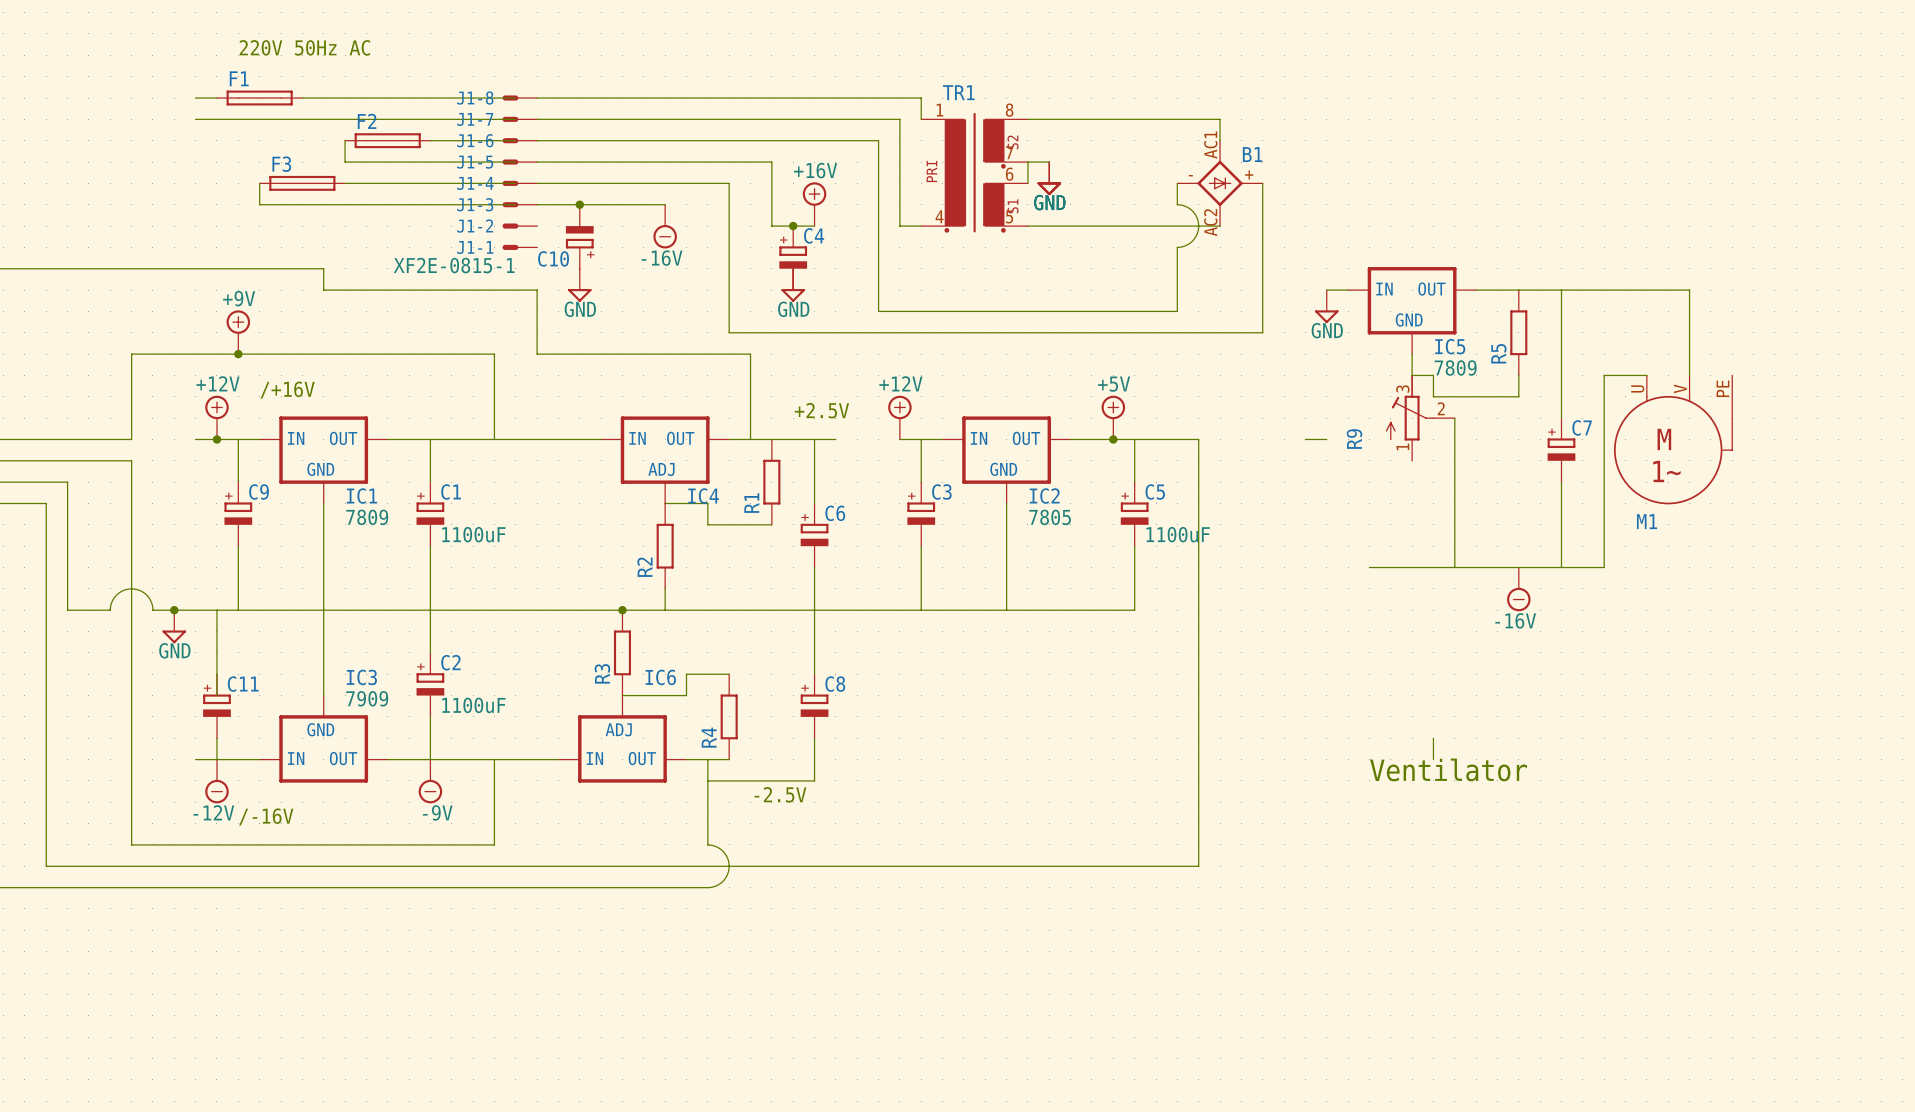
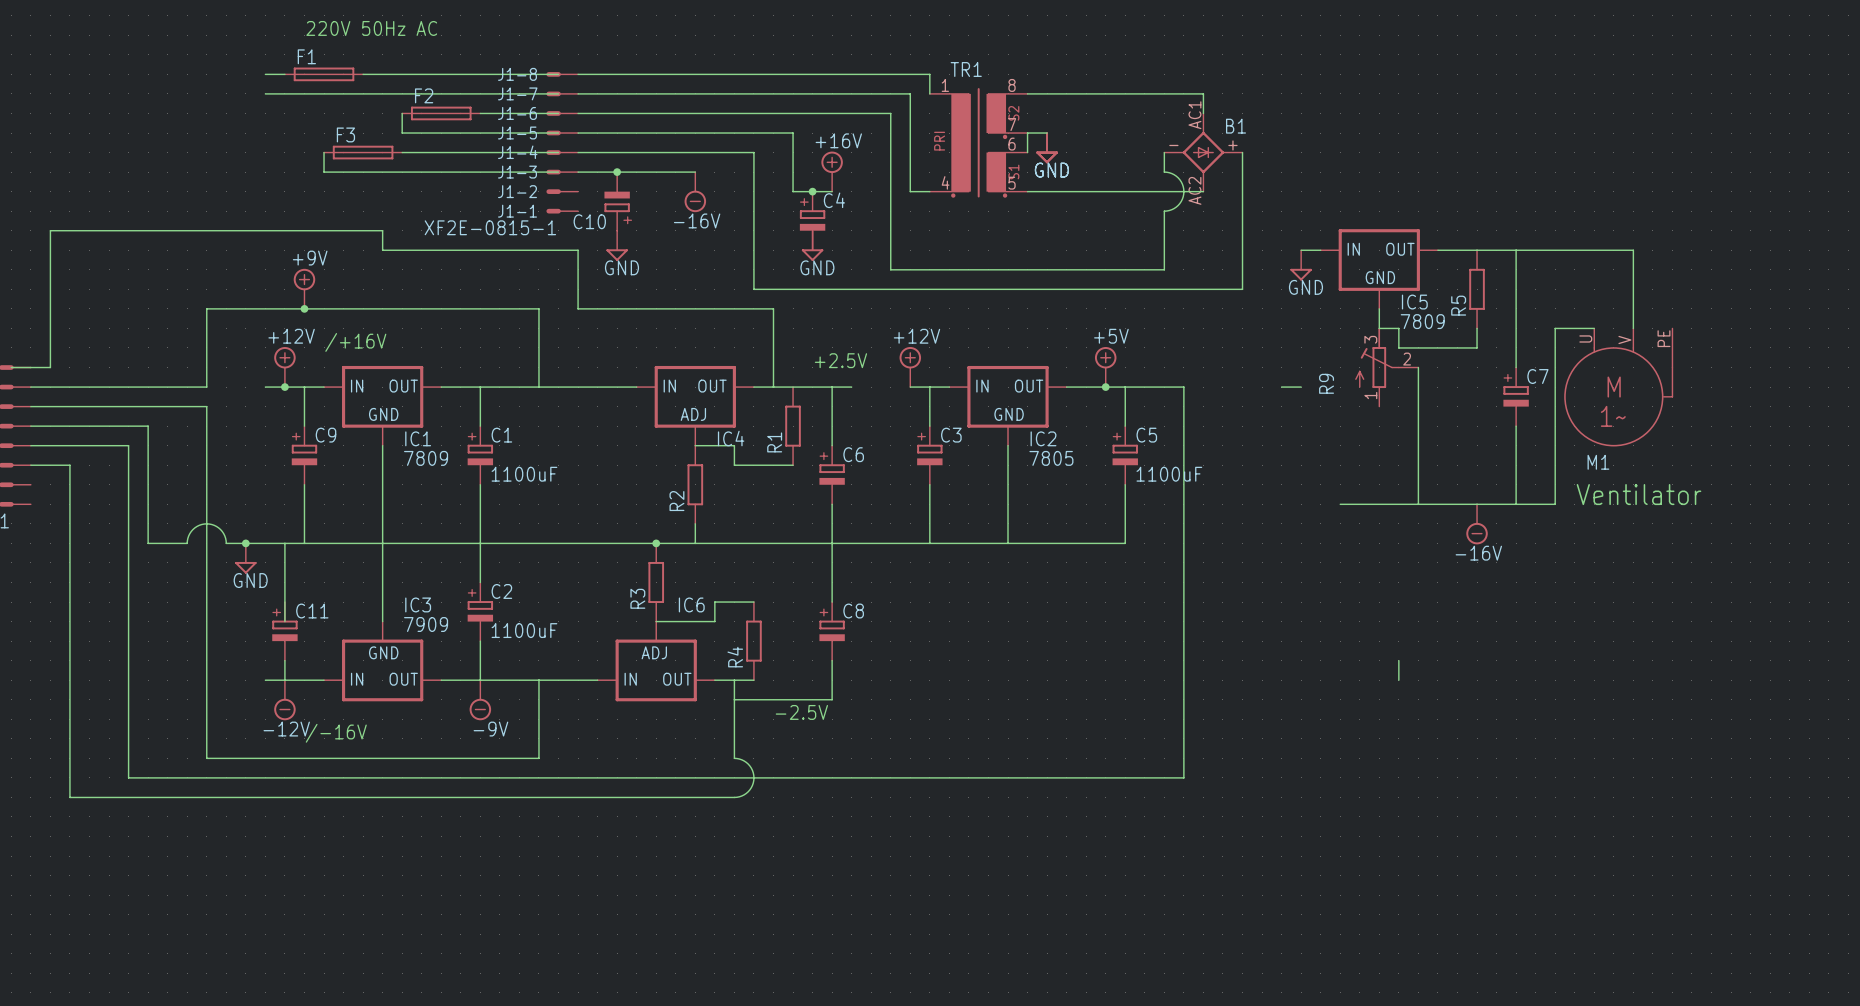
text: none -> Ventilator (1639, 494)
text: Ventilator (1448, 769) -> none

